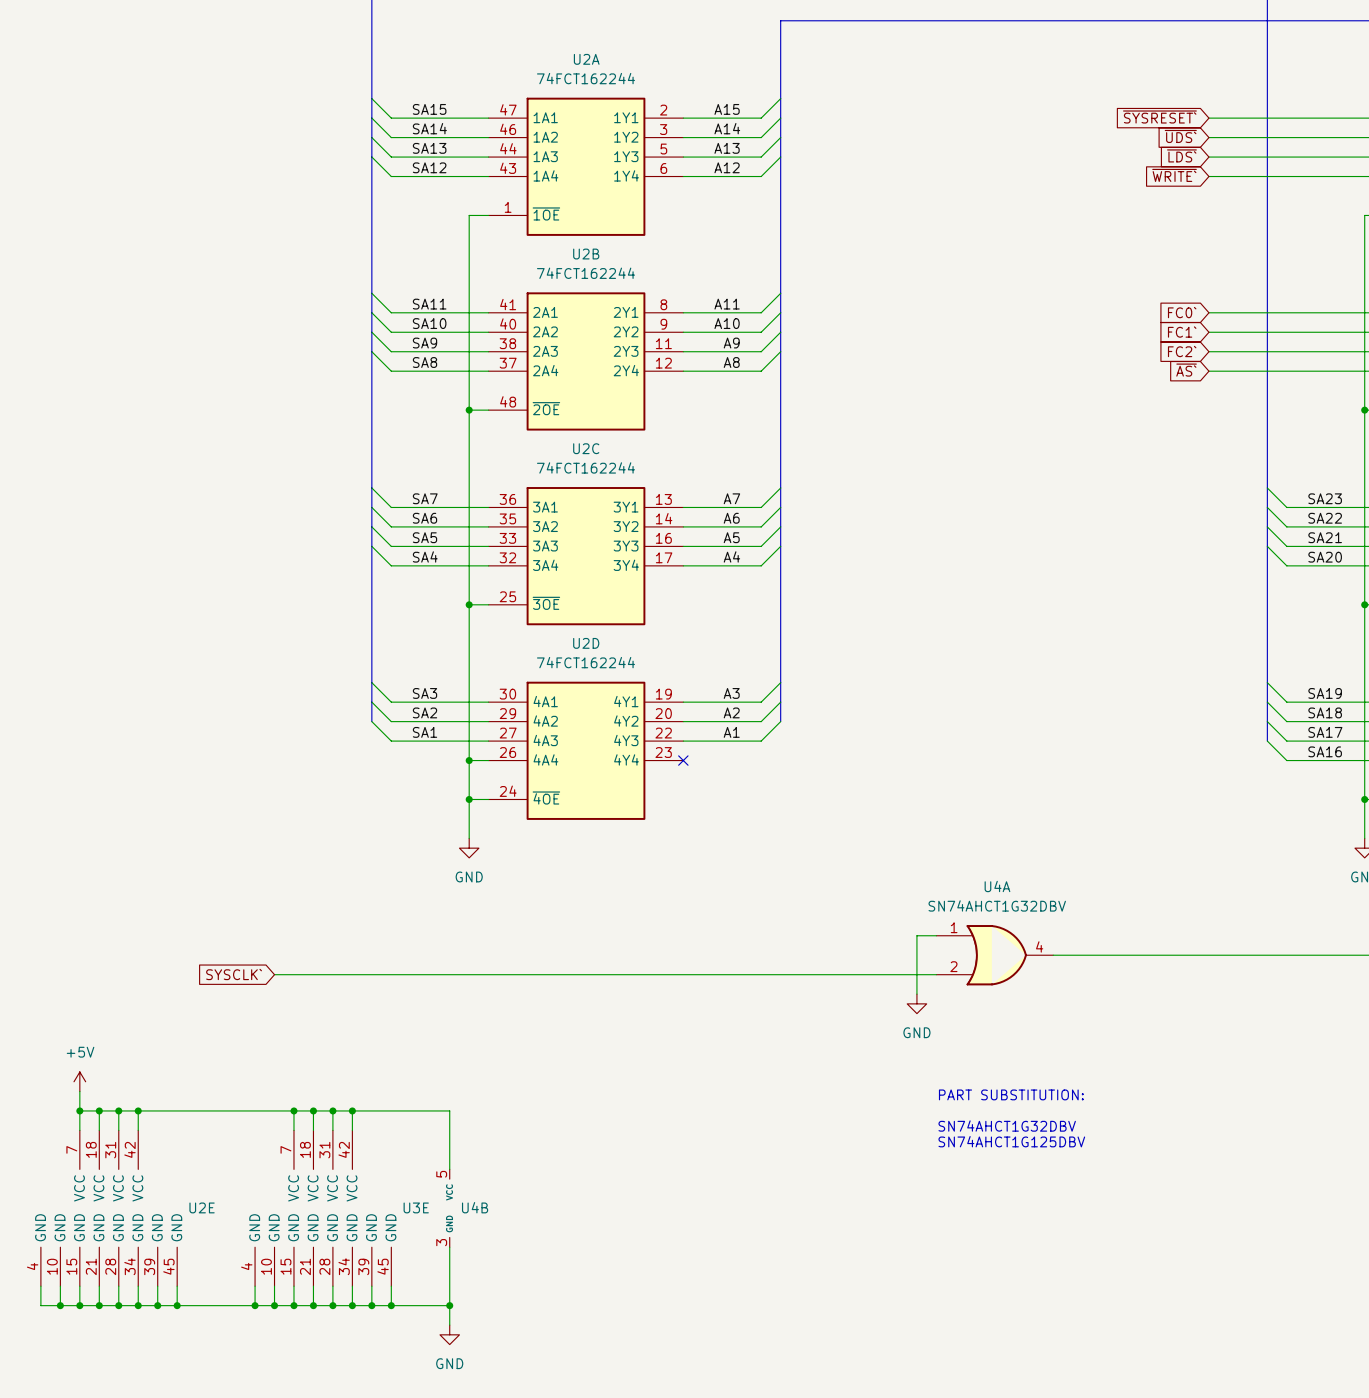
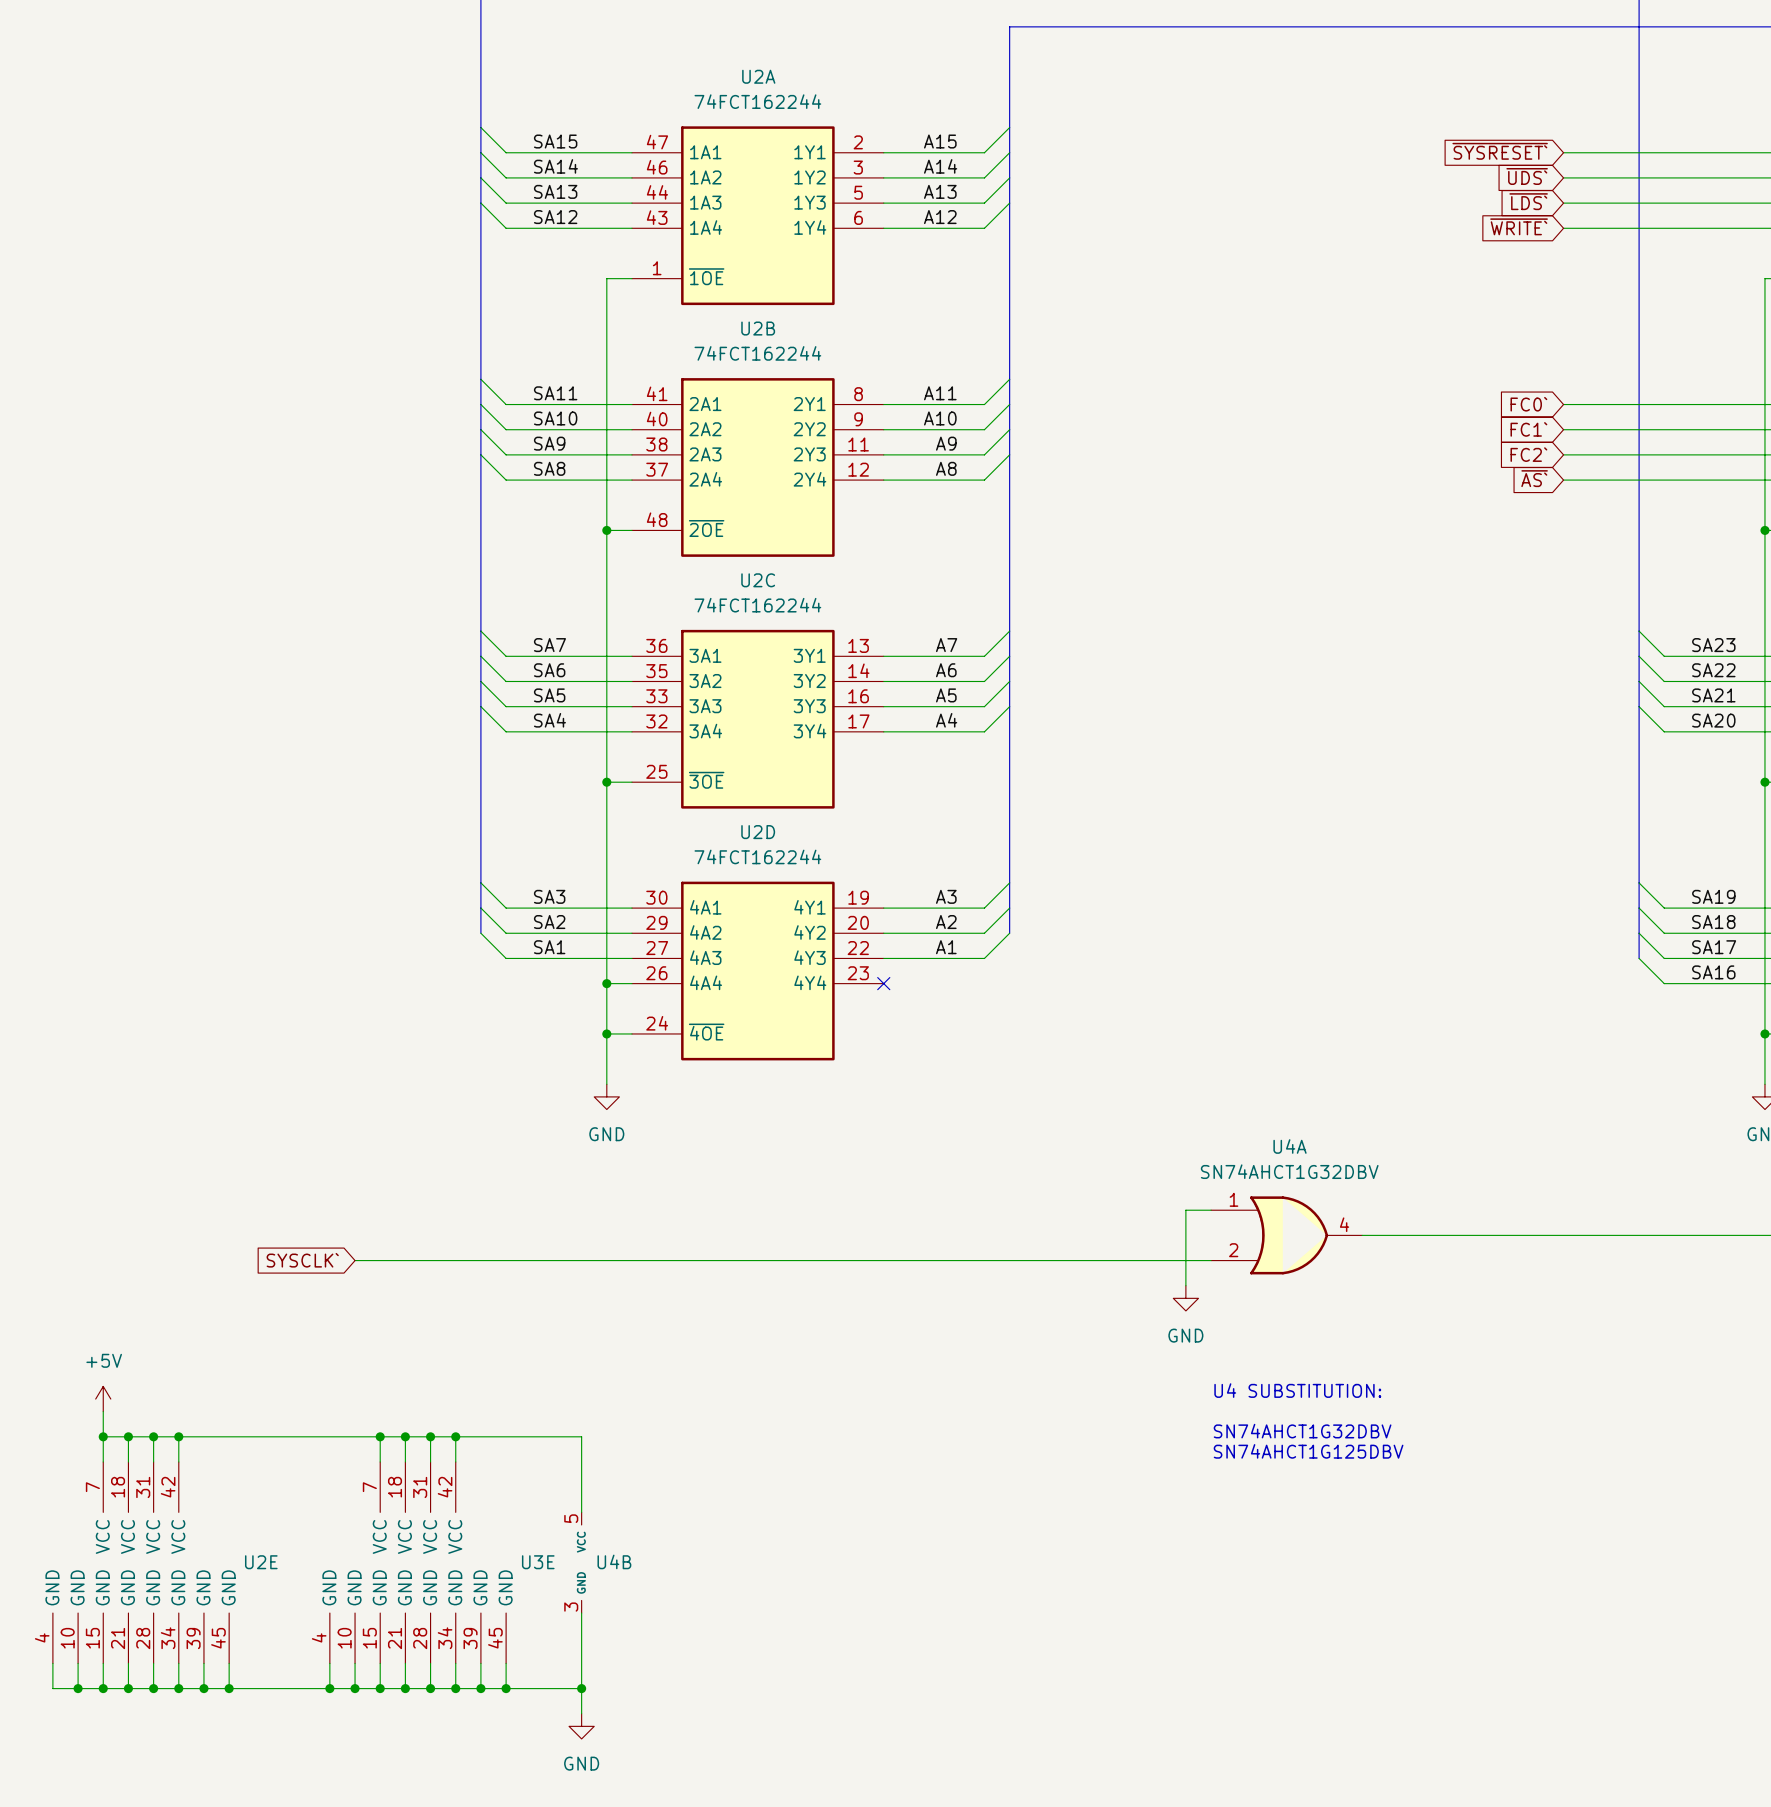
text: PART SUBSTITUTION: (1011, 1094) -> U4 SUBSTITUTION: (1297, 1390)
text: none -> SN74AHCT1G32DBV (1302, 1431)
text: SN74AHCT1G32DBV (1007, 1126) -> SN74AHCT1G125DBV (1308, 1451)
text: SN74AHCT1G125DBV (1011, 1141) -> none

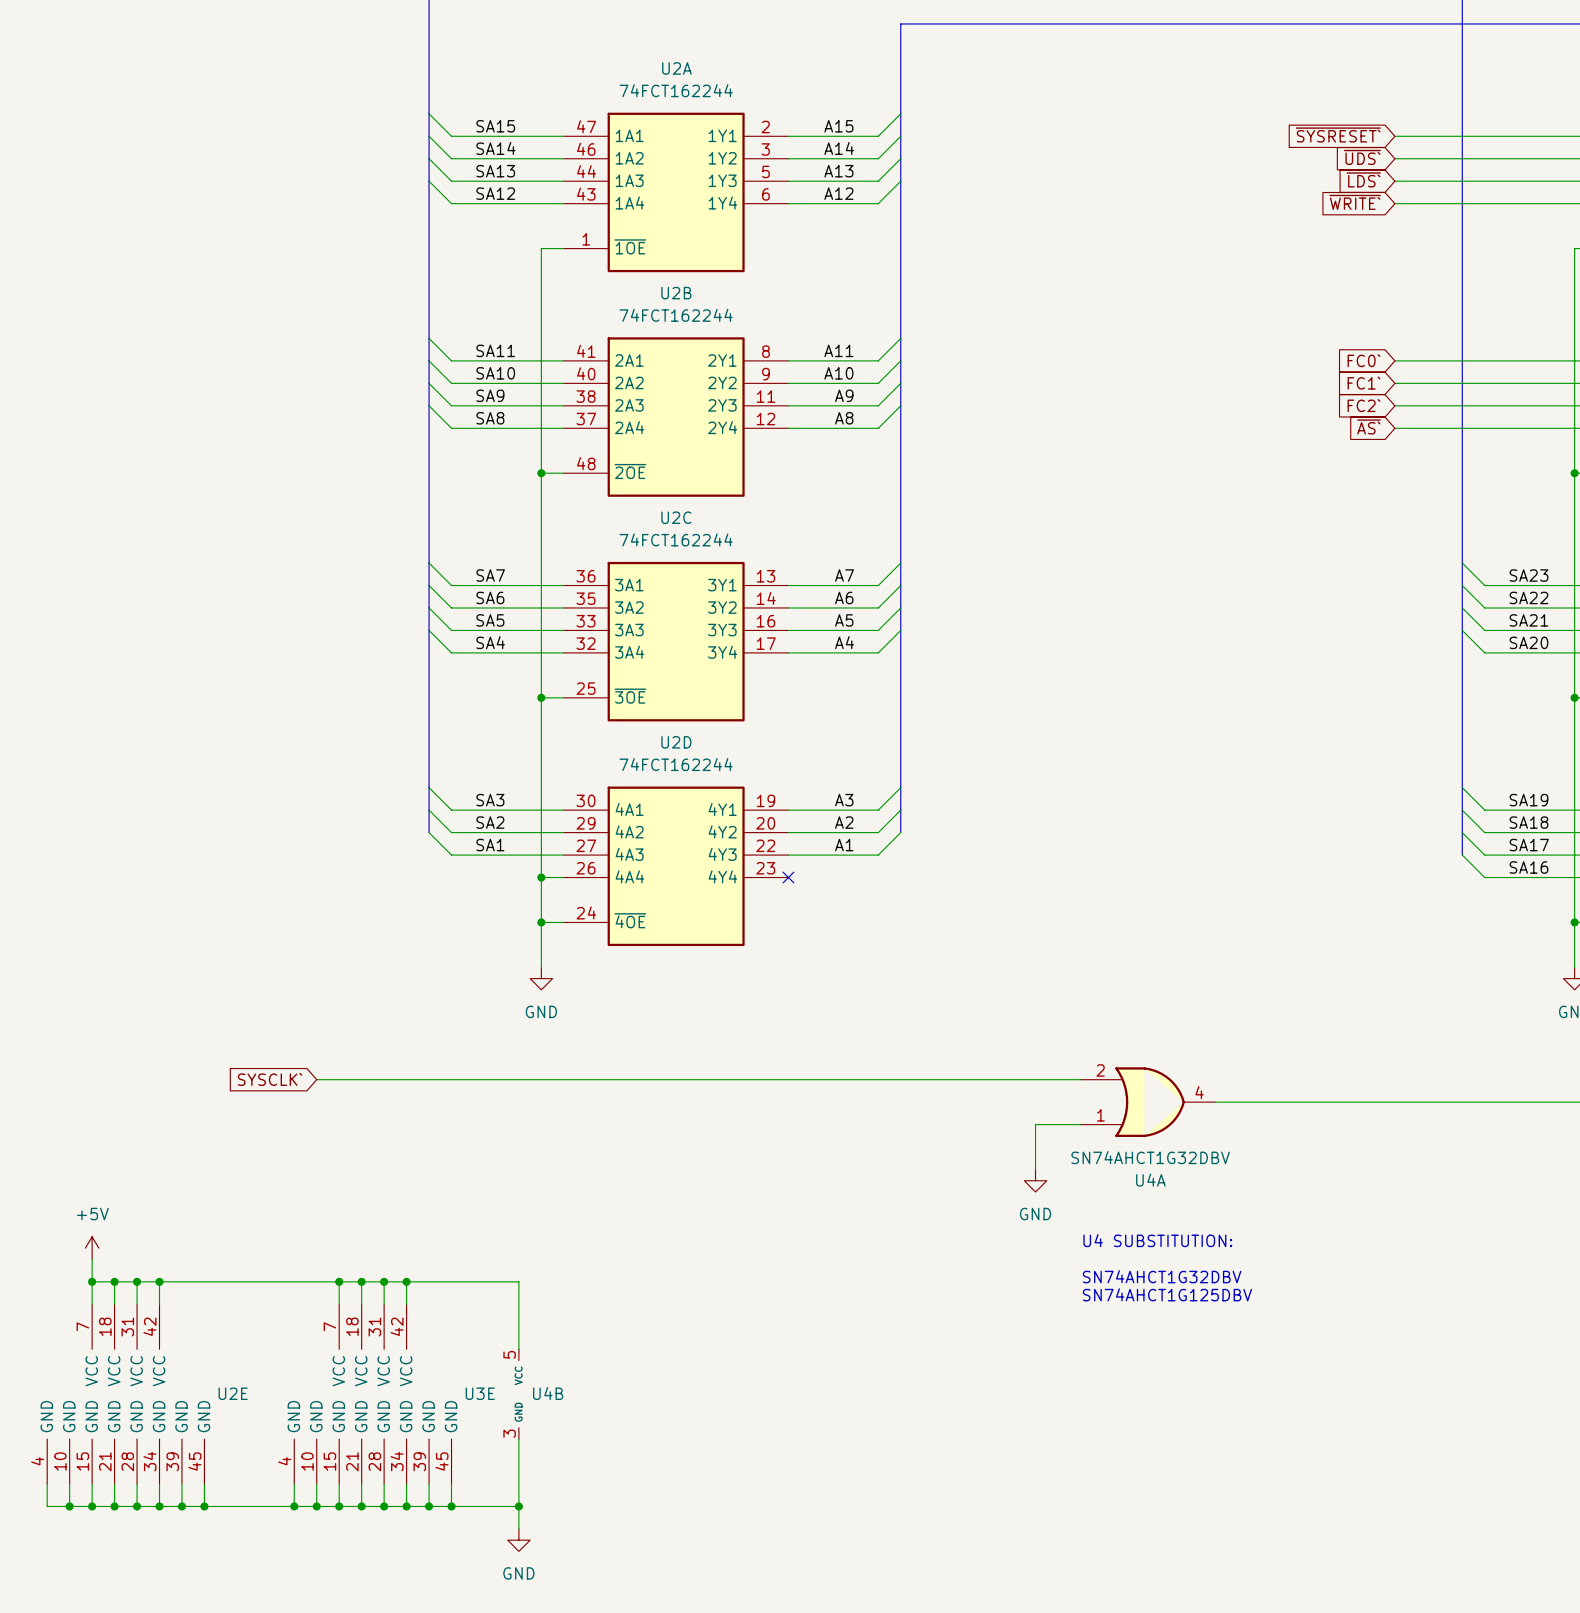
wire: (1185, 1210) (1185, 1285) -> (1057, 1079) (316, 1079)
U4A flip: as is (1289, 1235) -> up-down (1150, 1102)
global label position: SYSCLK` (302, 1260) -> SYSCLK` (270, 1079)
wire: (355, 1260) (1160, 1260) -> (1035, 1169) (1035, 1124)
power symbol position: GND (1185, 1298) -> GND (1035, 1180)

